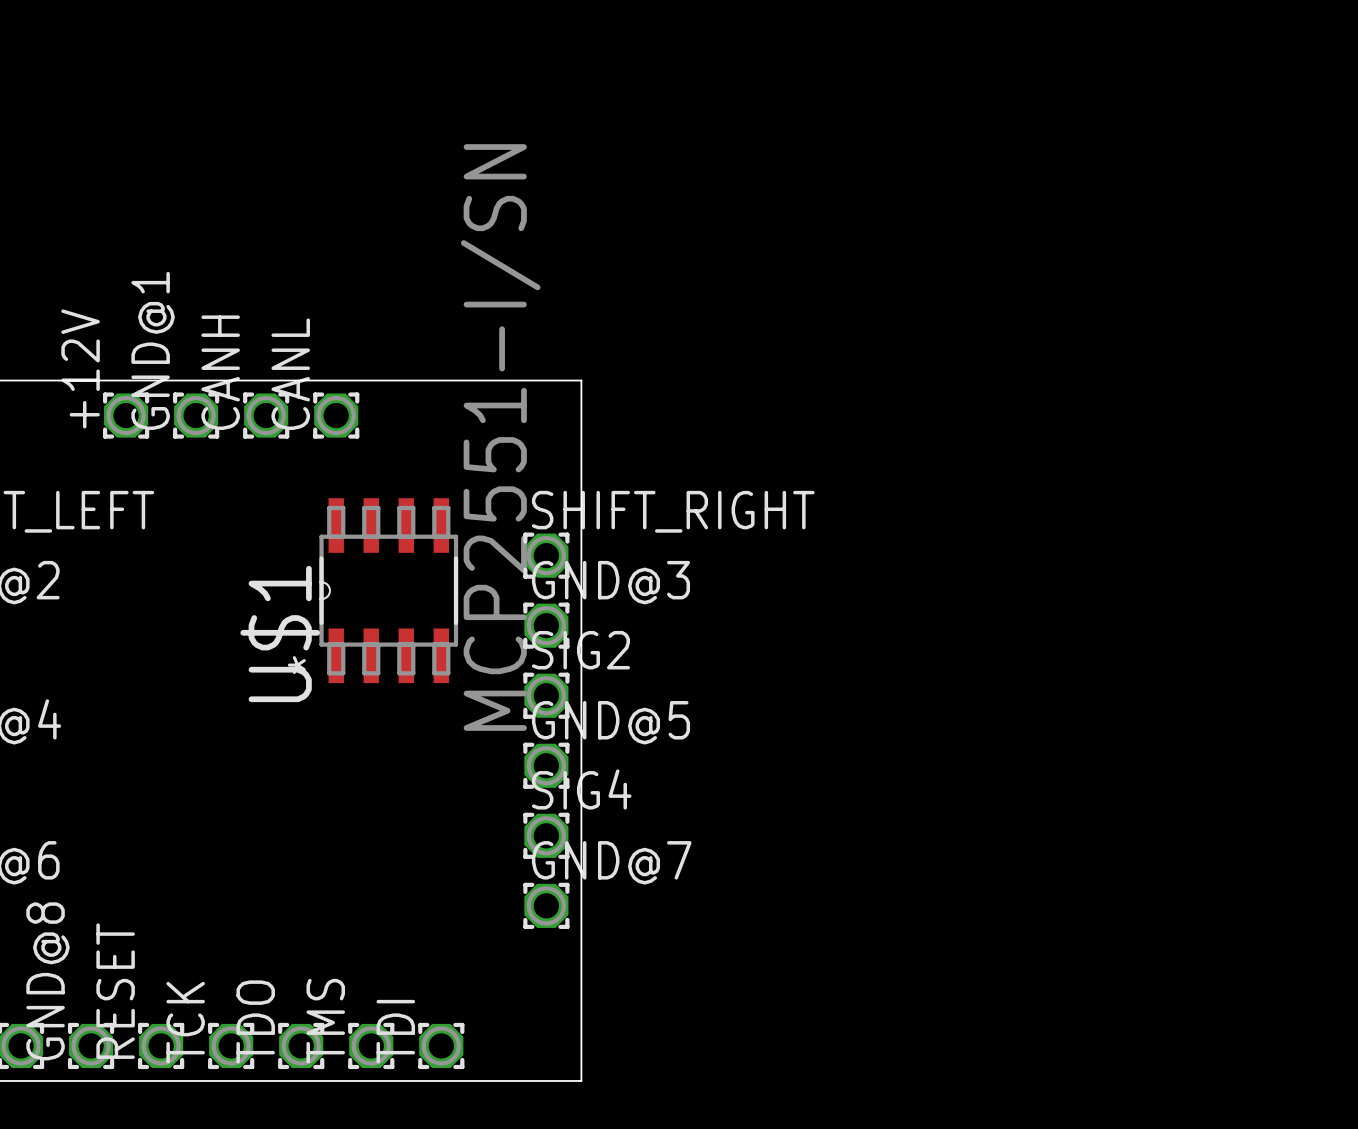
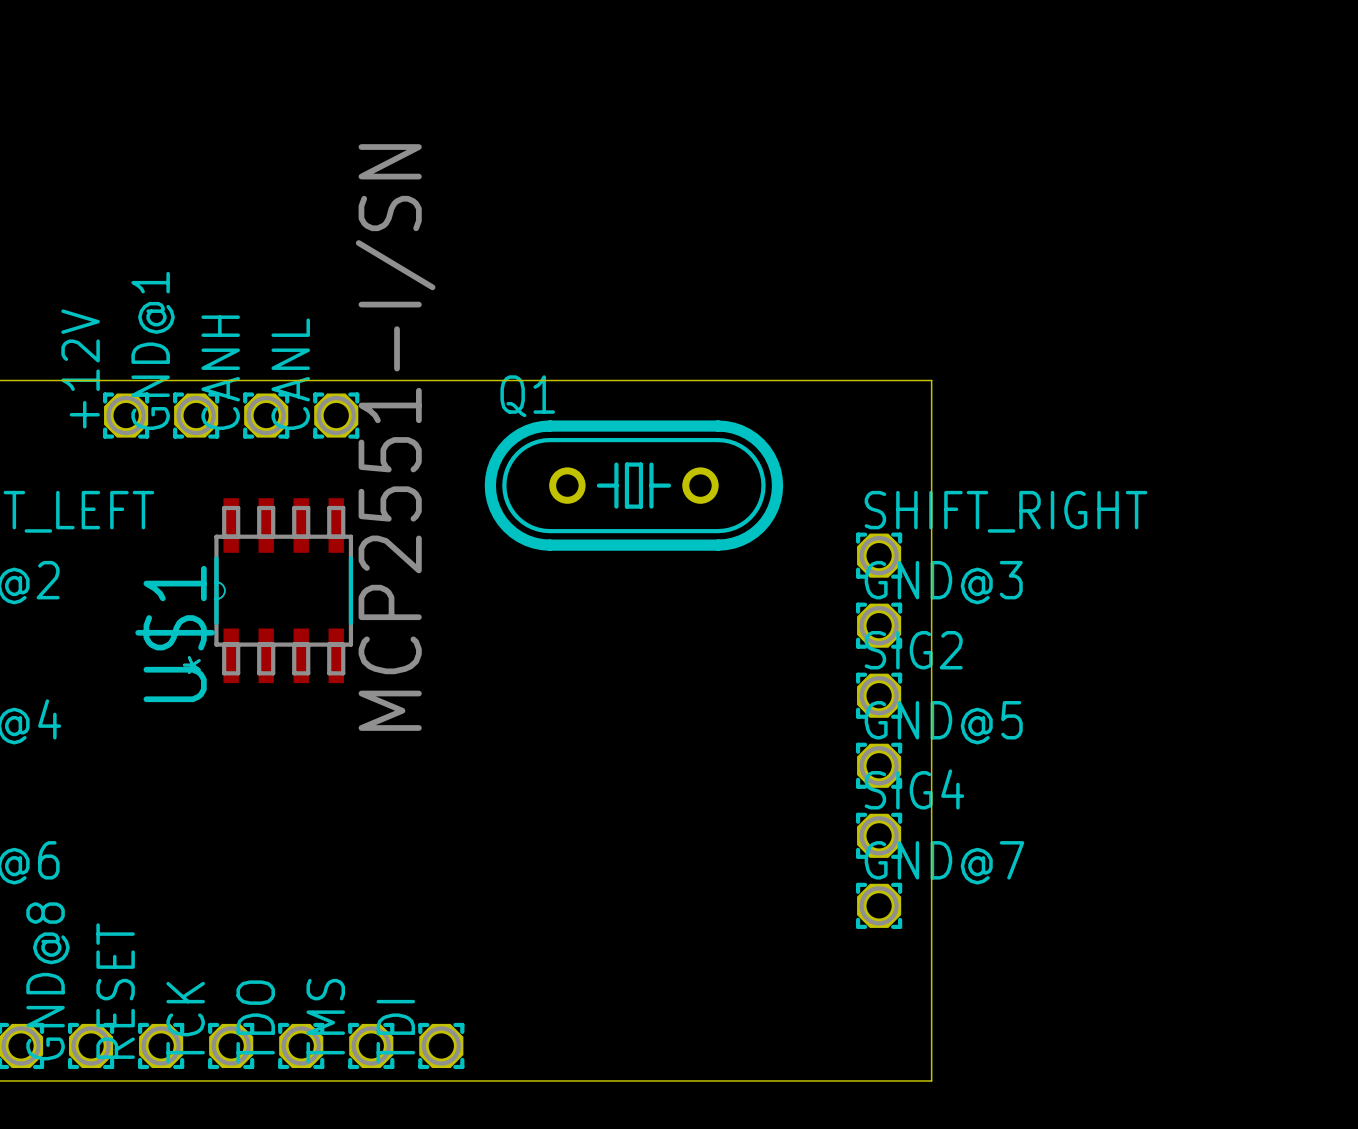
board edge: (581, 380) (581, 1080) -> (581, 380) (931, 380) (931, 1080) (581, 1080)
Q1: none -> (633, 485)
SHIFT_RIGHT position: (546, 555) -> (879, 555)
U$1 position: (388, 590) -> (283, 590)
GND@3 position: (546, 625) -> (879, 625)
SIG2 position: (546, 695) -> (879, 695)
GND@5 position: (546, 765) -> (879, 765)
SIG4 position: (546, 835) -> (879, 835)
GND@7 position: (546, 905) -> (879, 905)

